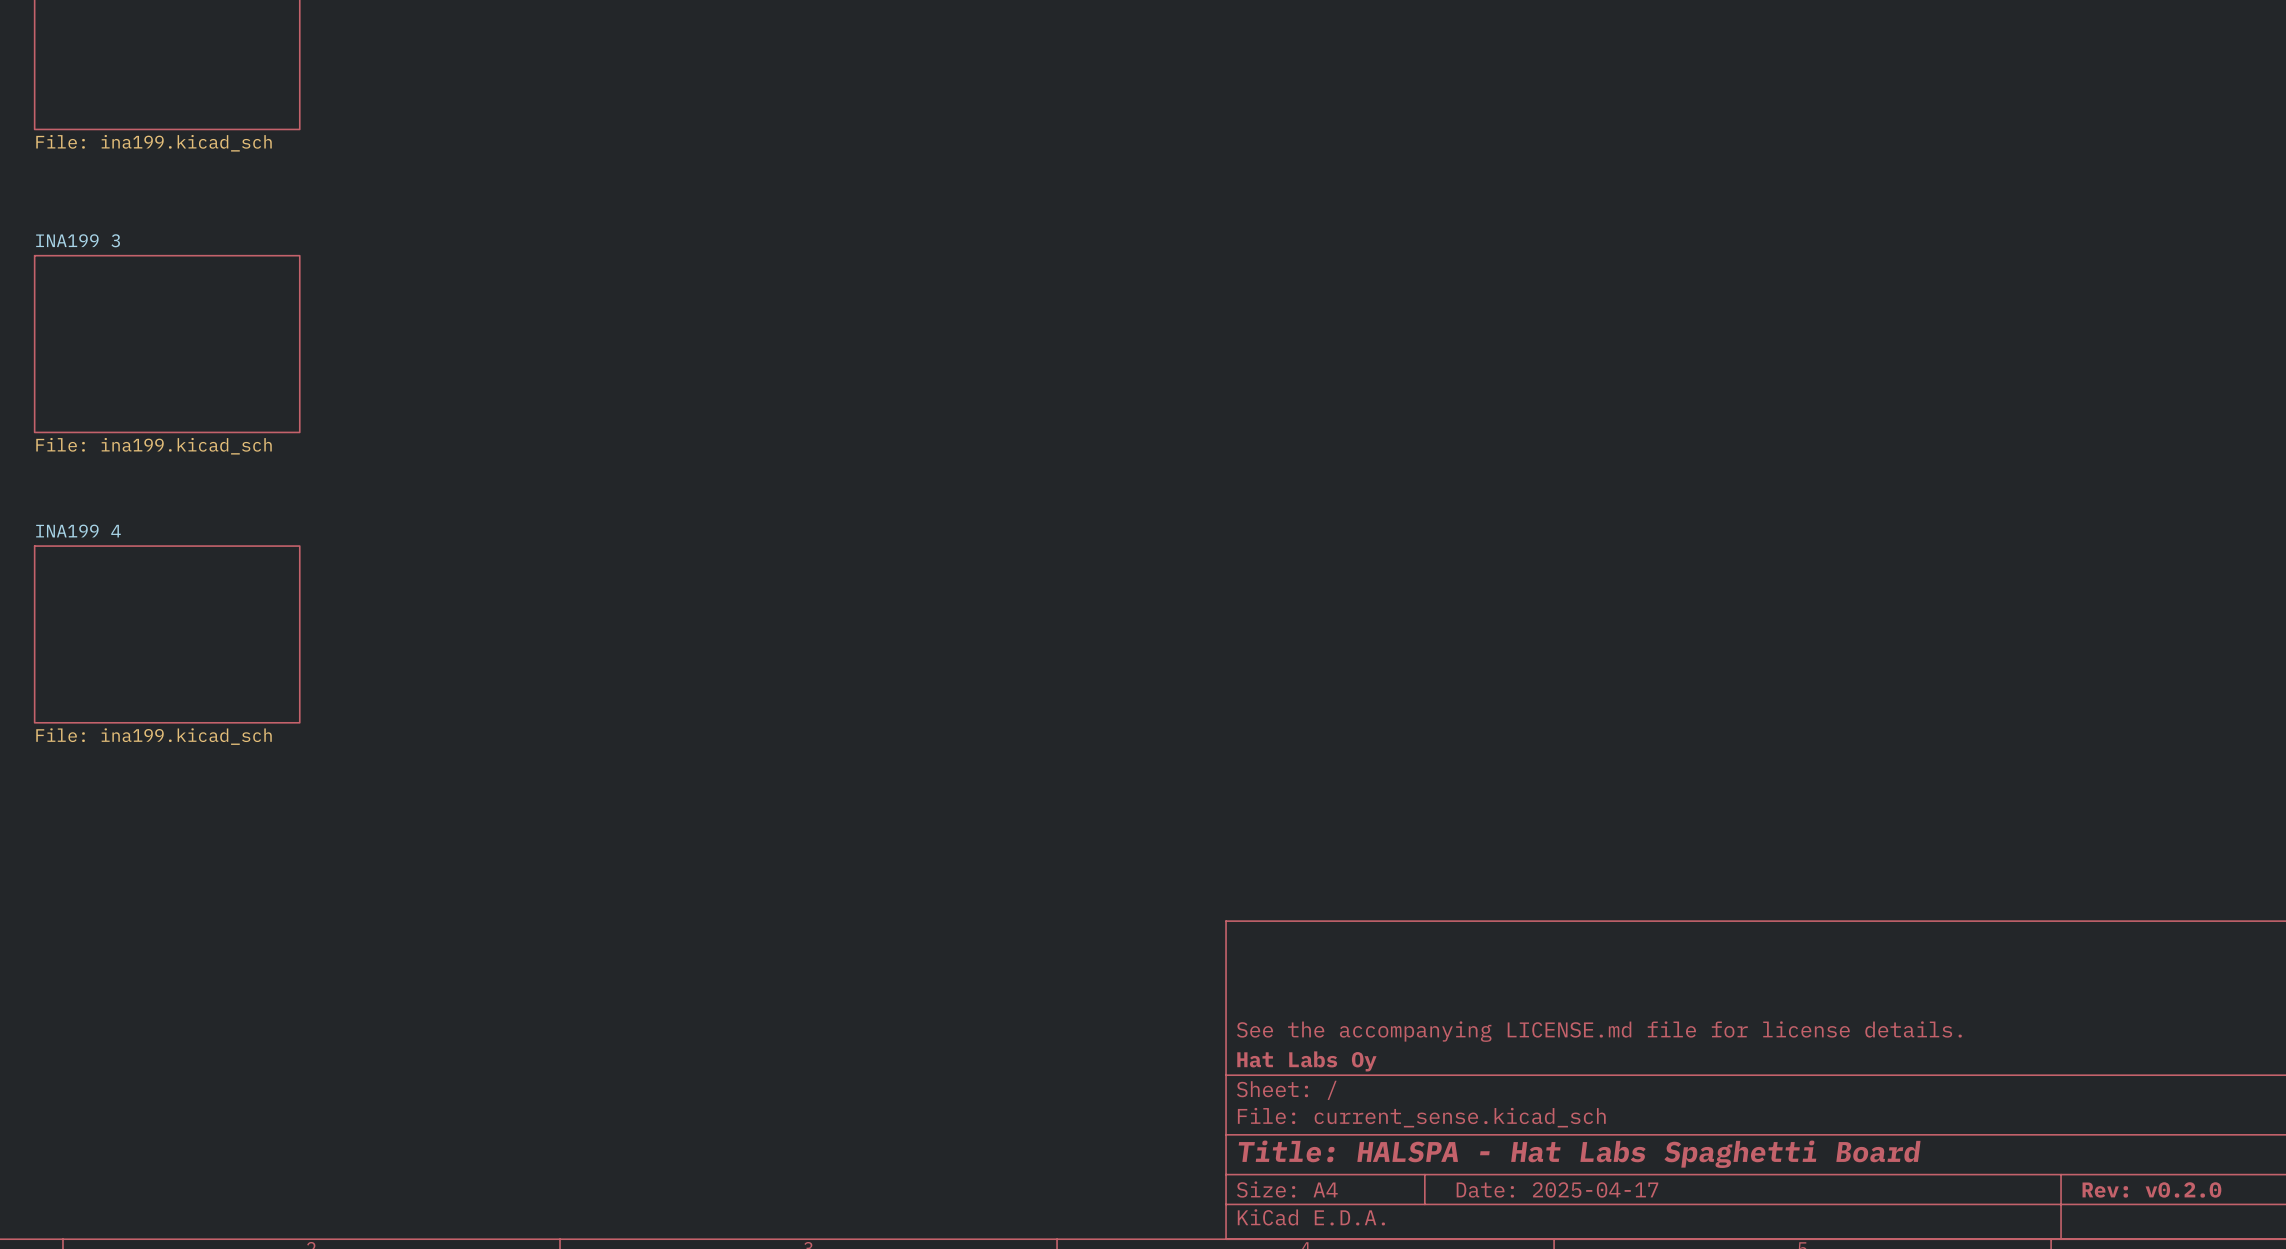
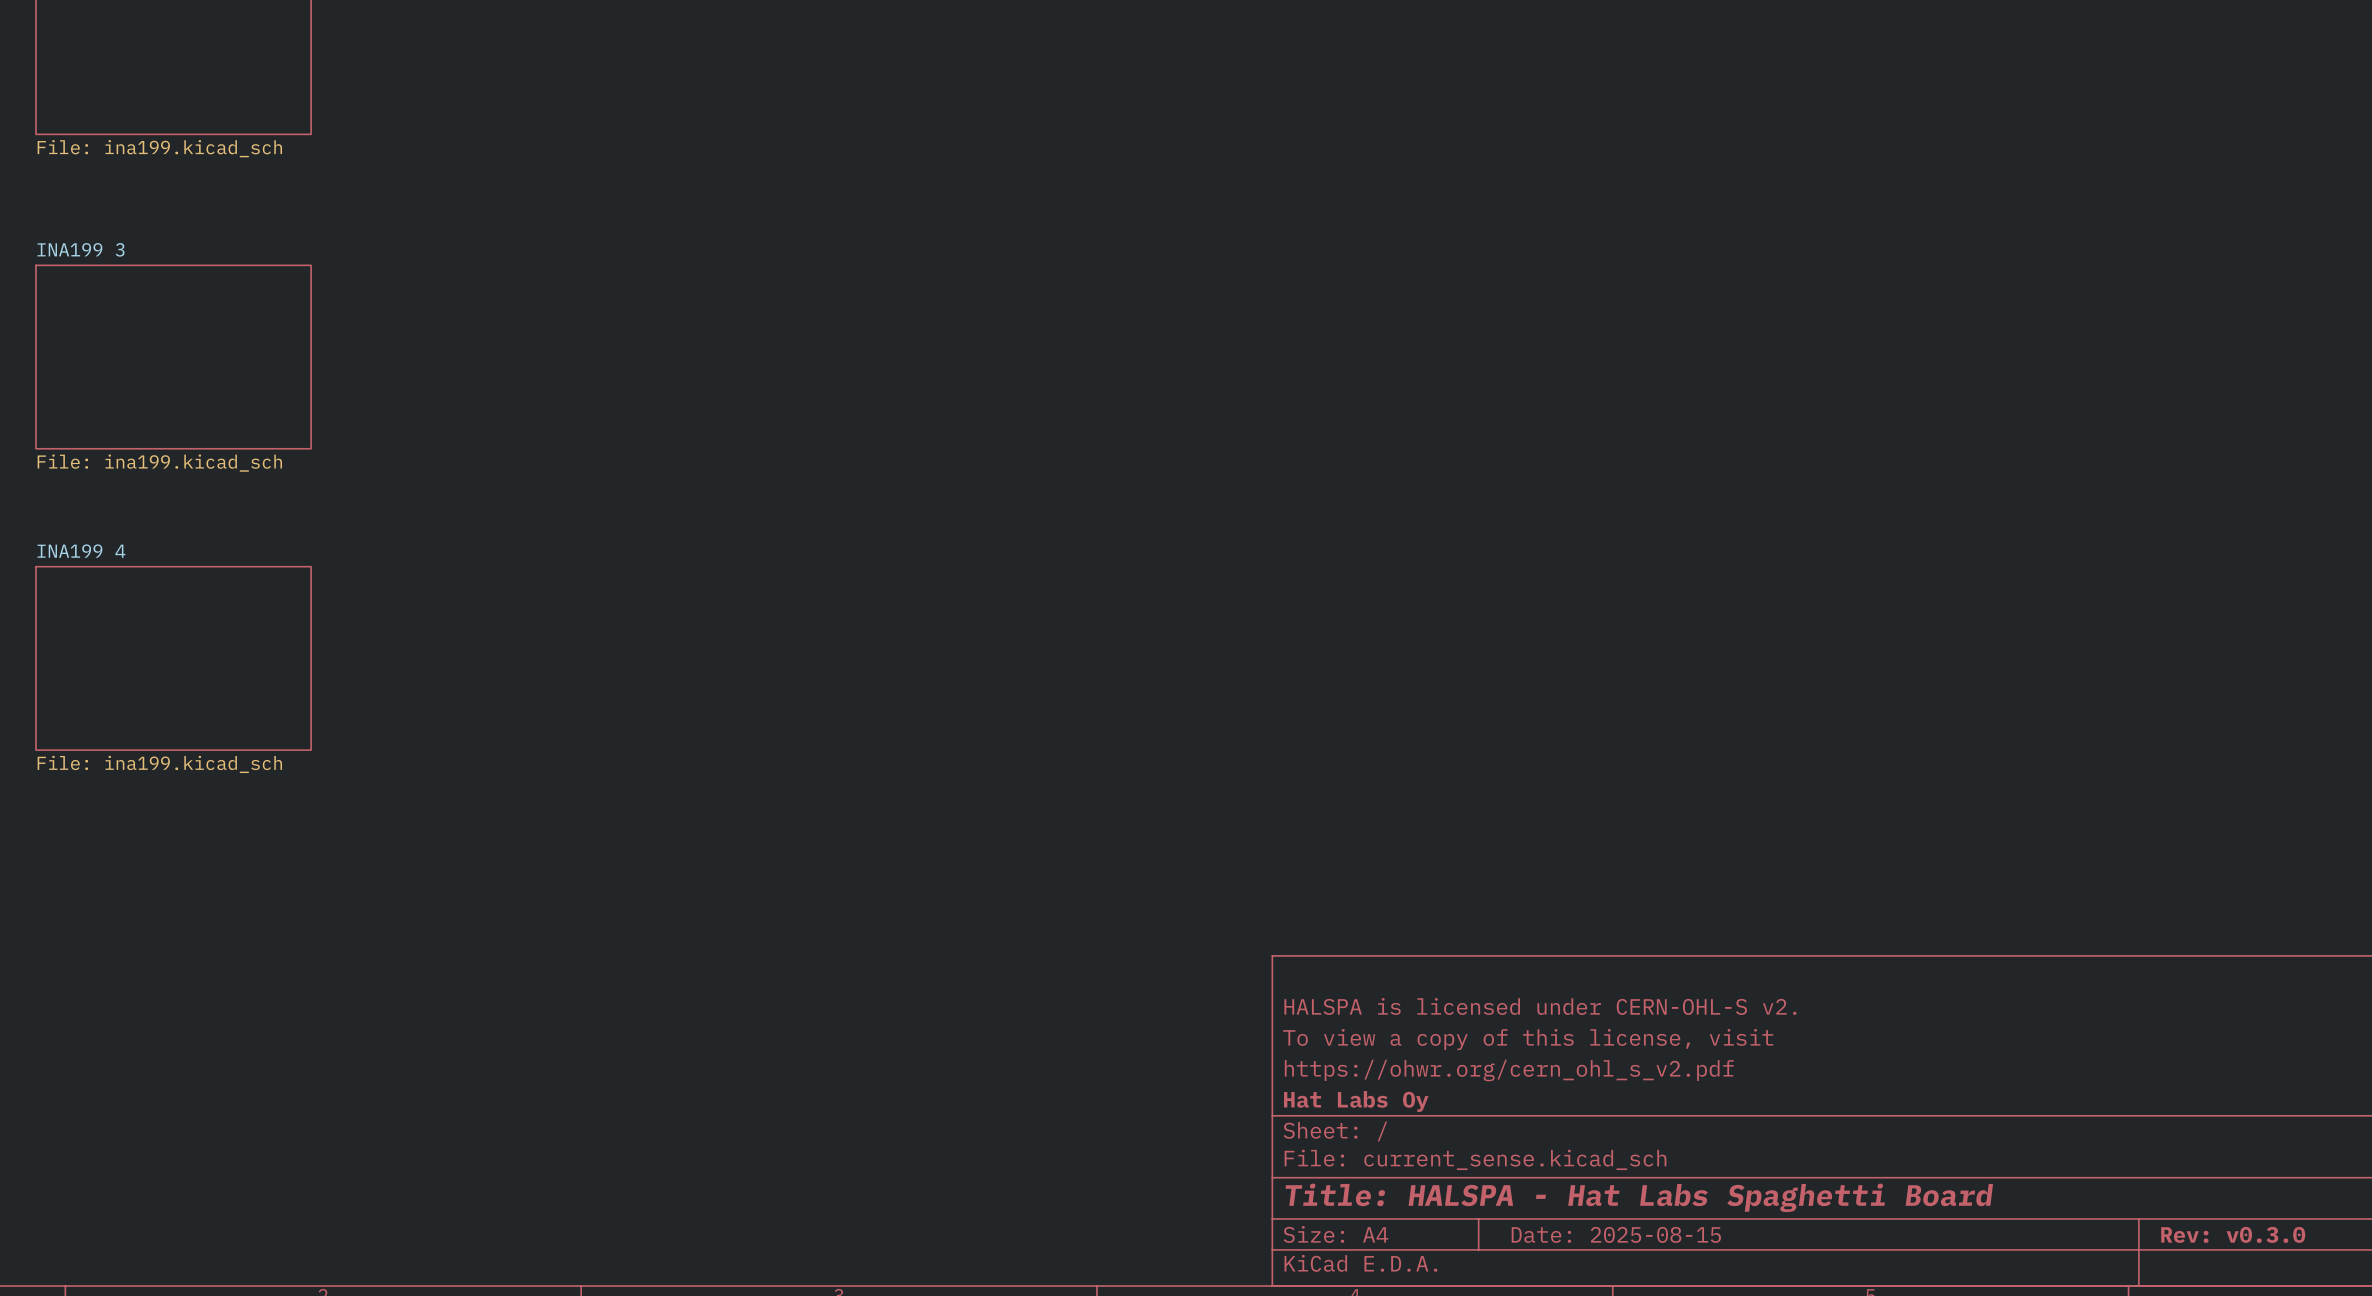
title block: none -> HALSPA is licensed under CERN-OHL-S v2. (1540, 1006)
title block: none -> To view a copy of this license, visit (1528, 1039)
title block: See the accompanying LICENSE.md file for license details. (1599, 1031) -> https://ohwr.org/cern_ohl_s_v2.pdf (1509, 1070)
title block: Date: 2025-04-17 (1557, 1189) -> Date: 2025-08-15 (1616, 1234)
title block: Rev: v0.2.0 (2151, 1189) -> Rev: v0.3.0 (2233, 1234)

